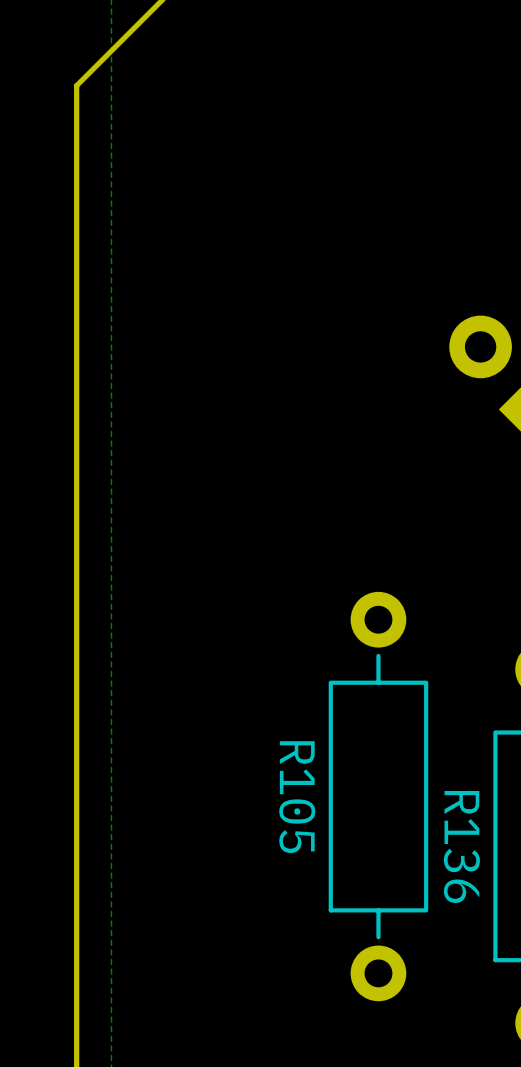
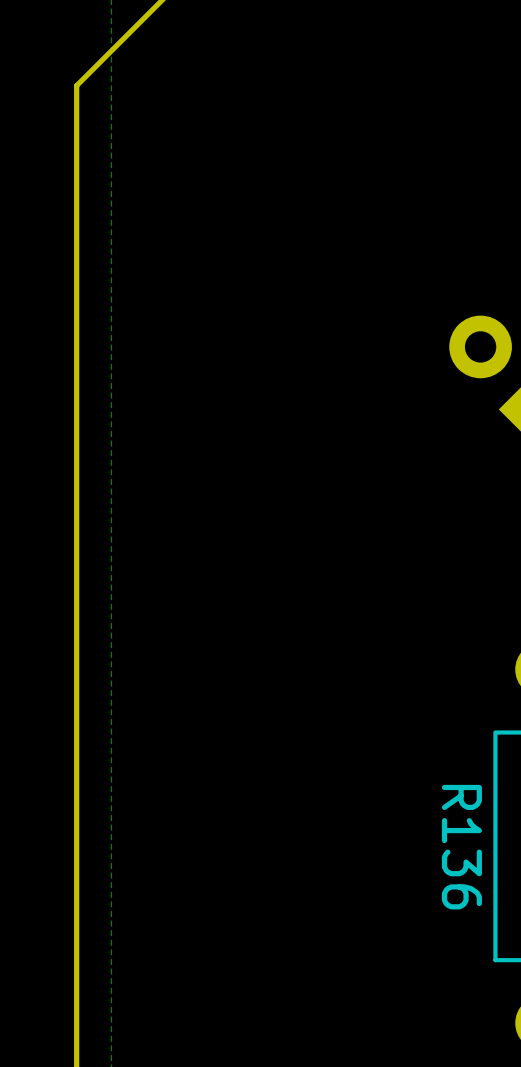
R105: (378, 796) -> none

